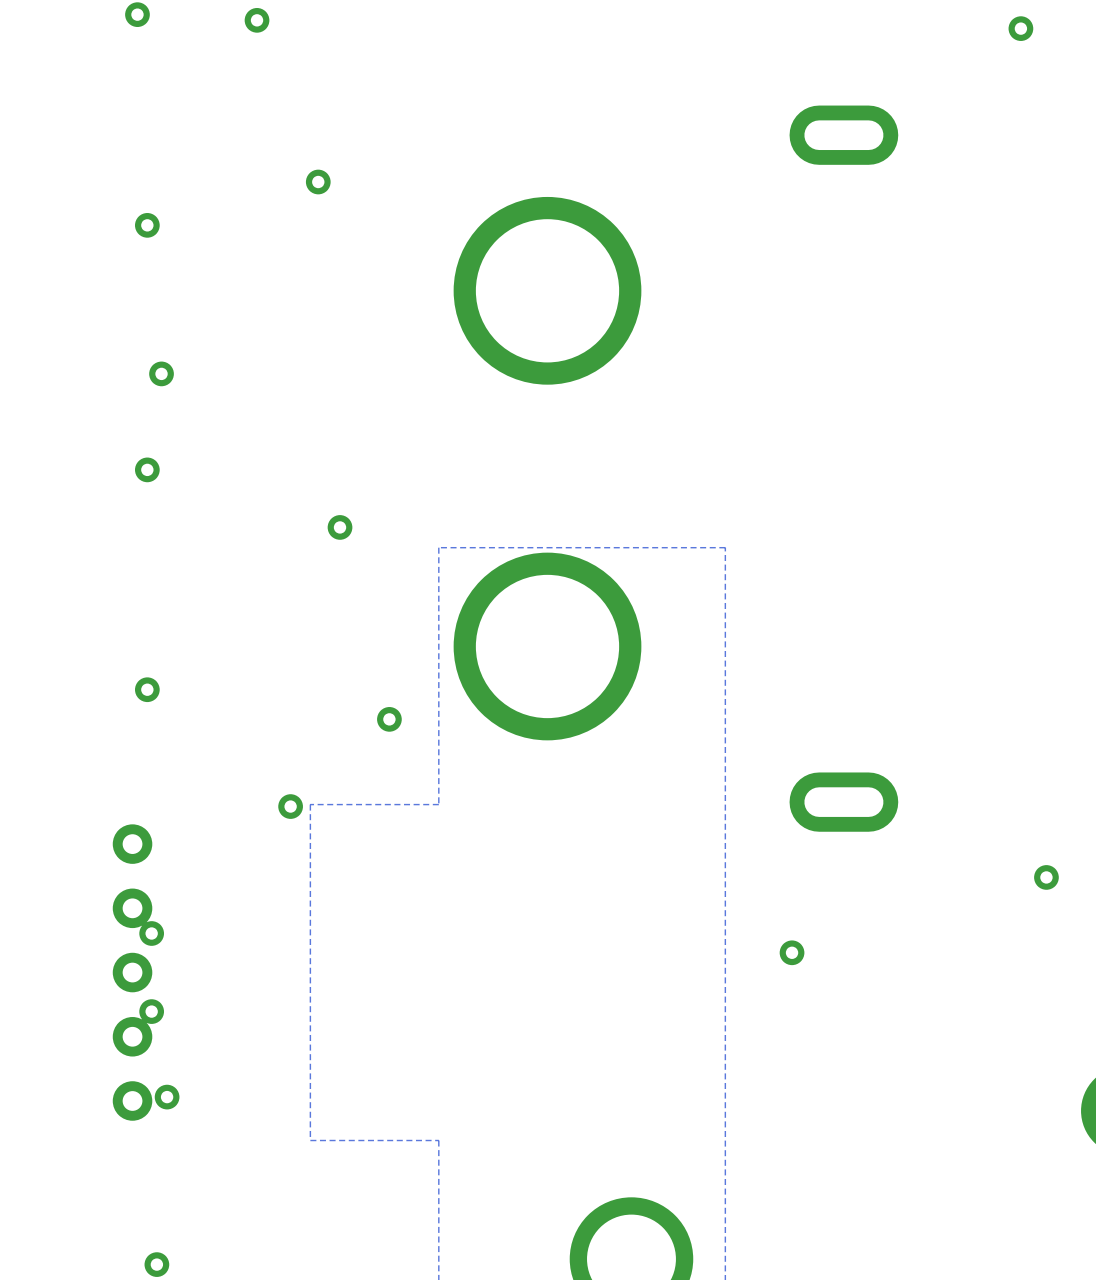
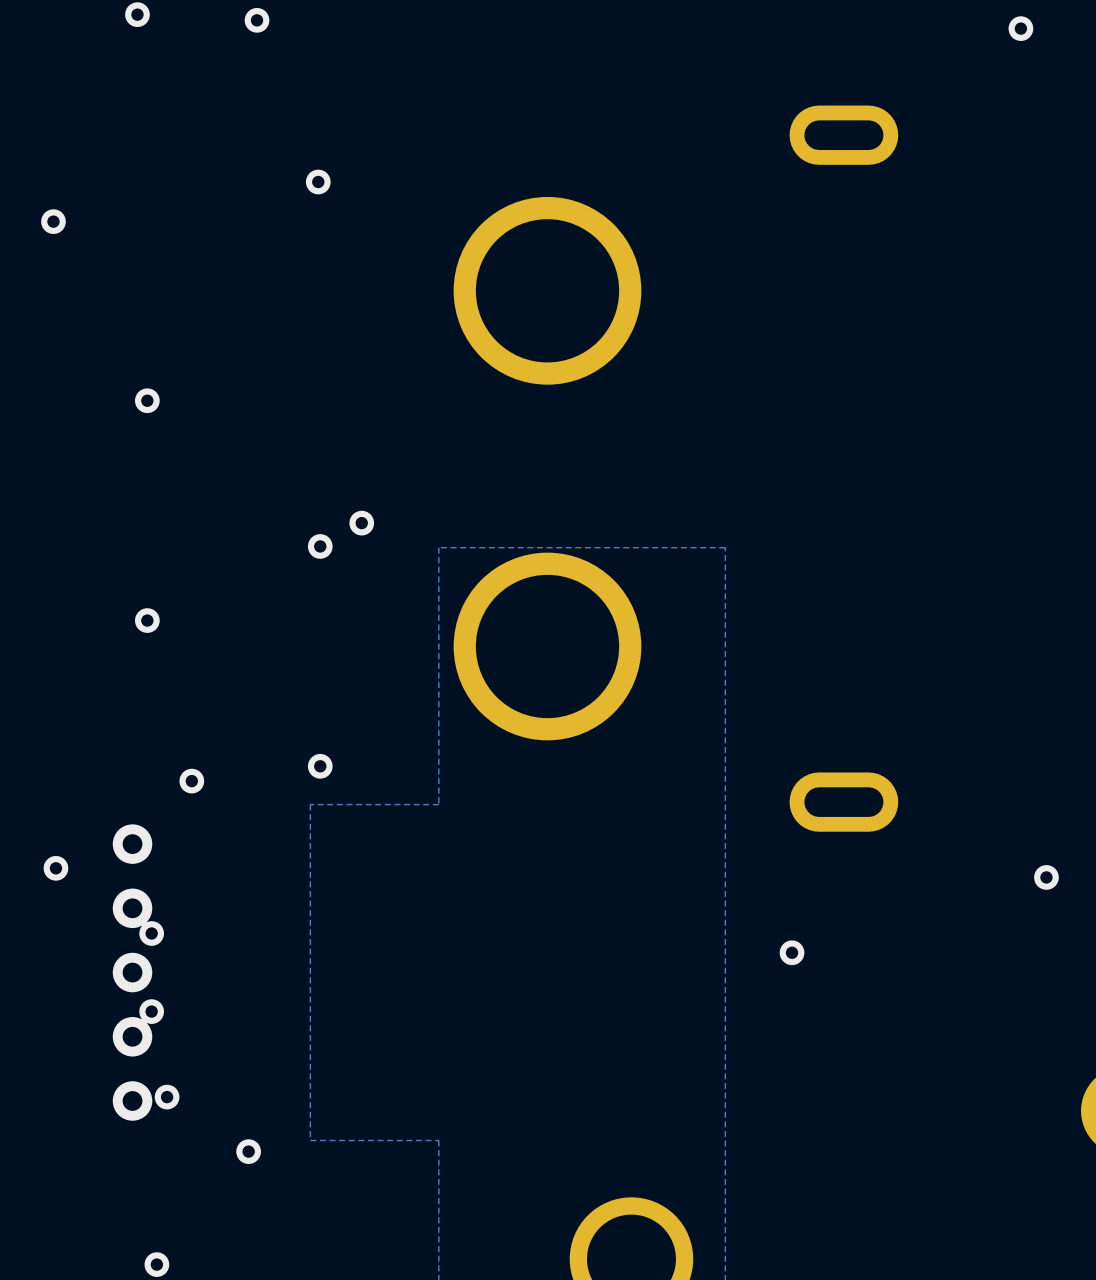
via: none -> (53, 221)
via: (147, 225) -> none
via position: (161, 373) -> (147, 400)
via: (147, 469) -> none
via: none -> (361, 523)
via: (340, 527) -> none
via: none -> (320, 546)
via: none -> (147, 620)
via: (147, 689) -> none
via: (389, 719) -> none
via: none -> (320, 766)
via: none -> (191, 781)
via: (290, 806) -> none
via: none -> (55, 868)
via: none -> (248, 1151)

